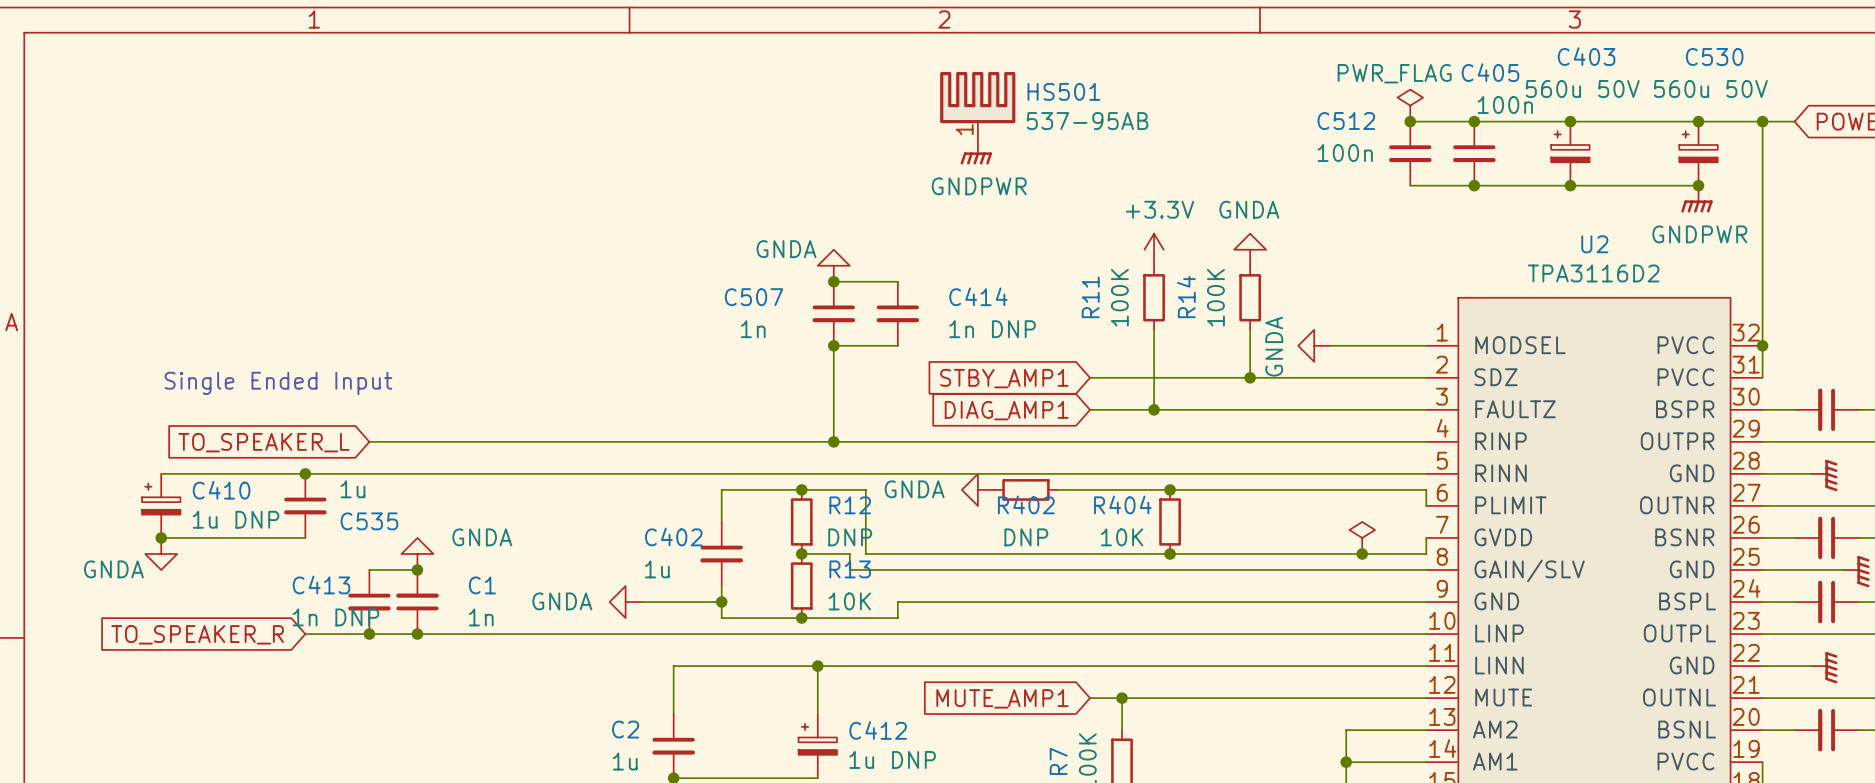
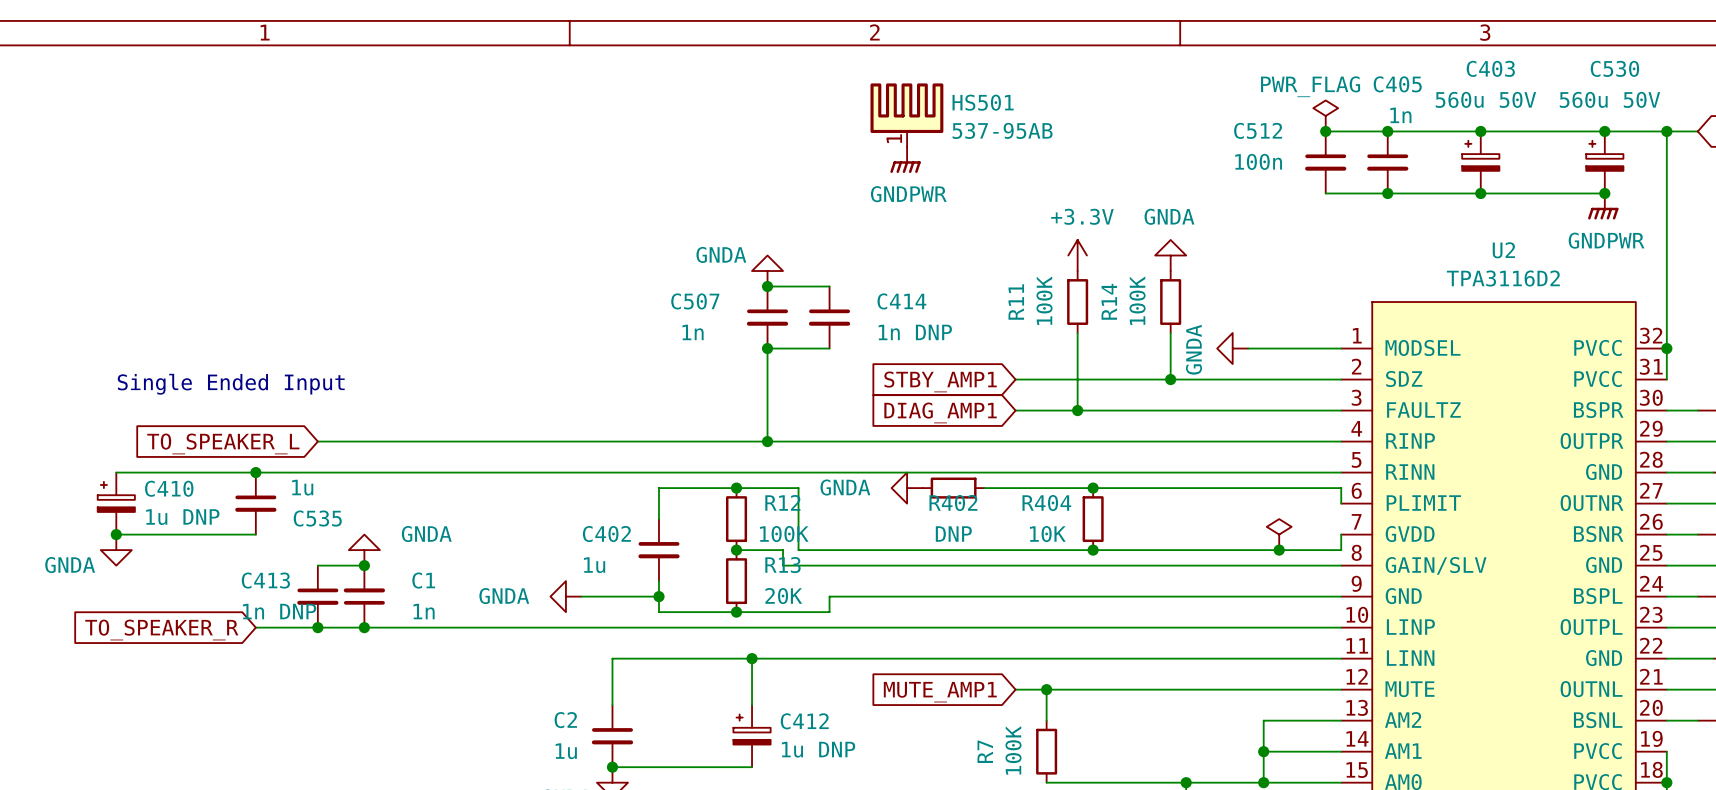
C405 value: 100n (1505, 105) -> 1n (1400, 115)
R12 value: DNP (850, 537) -> 100K (784, 534)
R13 value: 10K (849, 601) -> 20K (783, 596)

